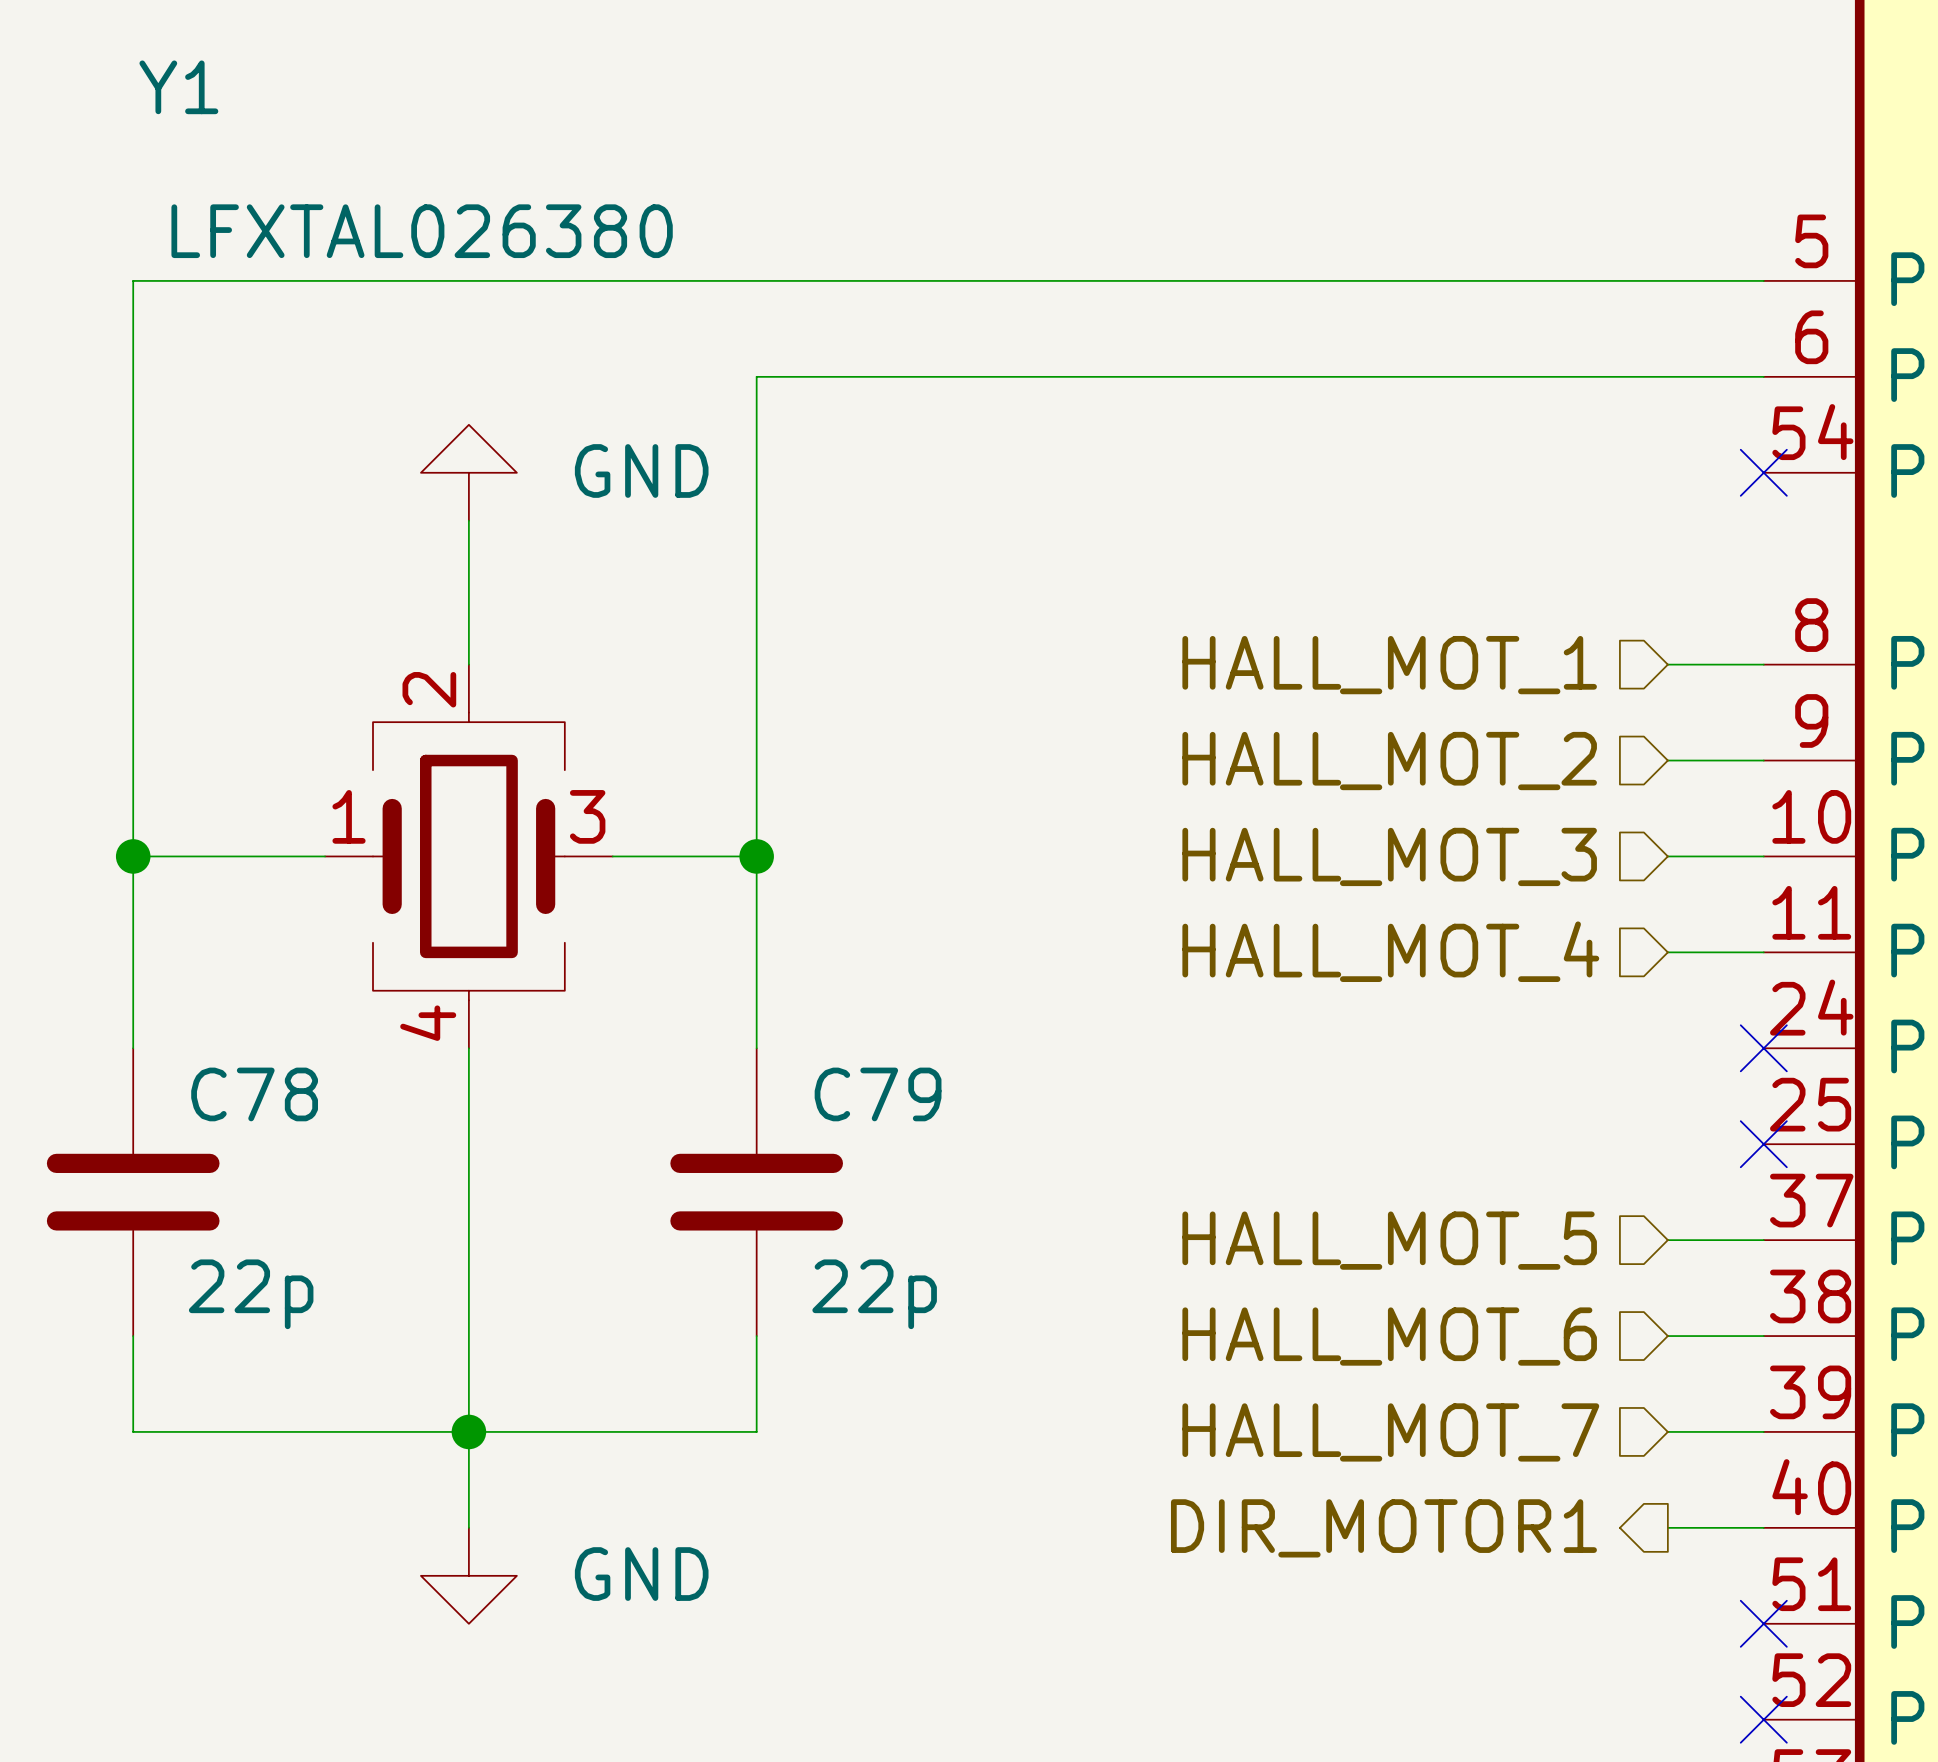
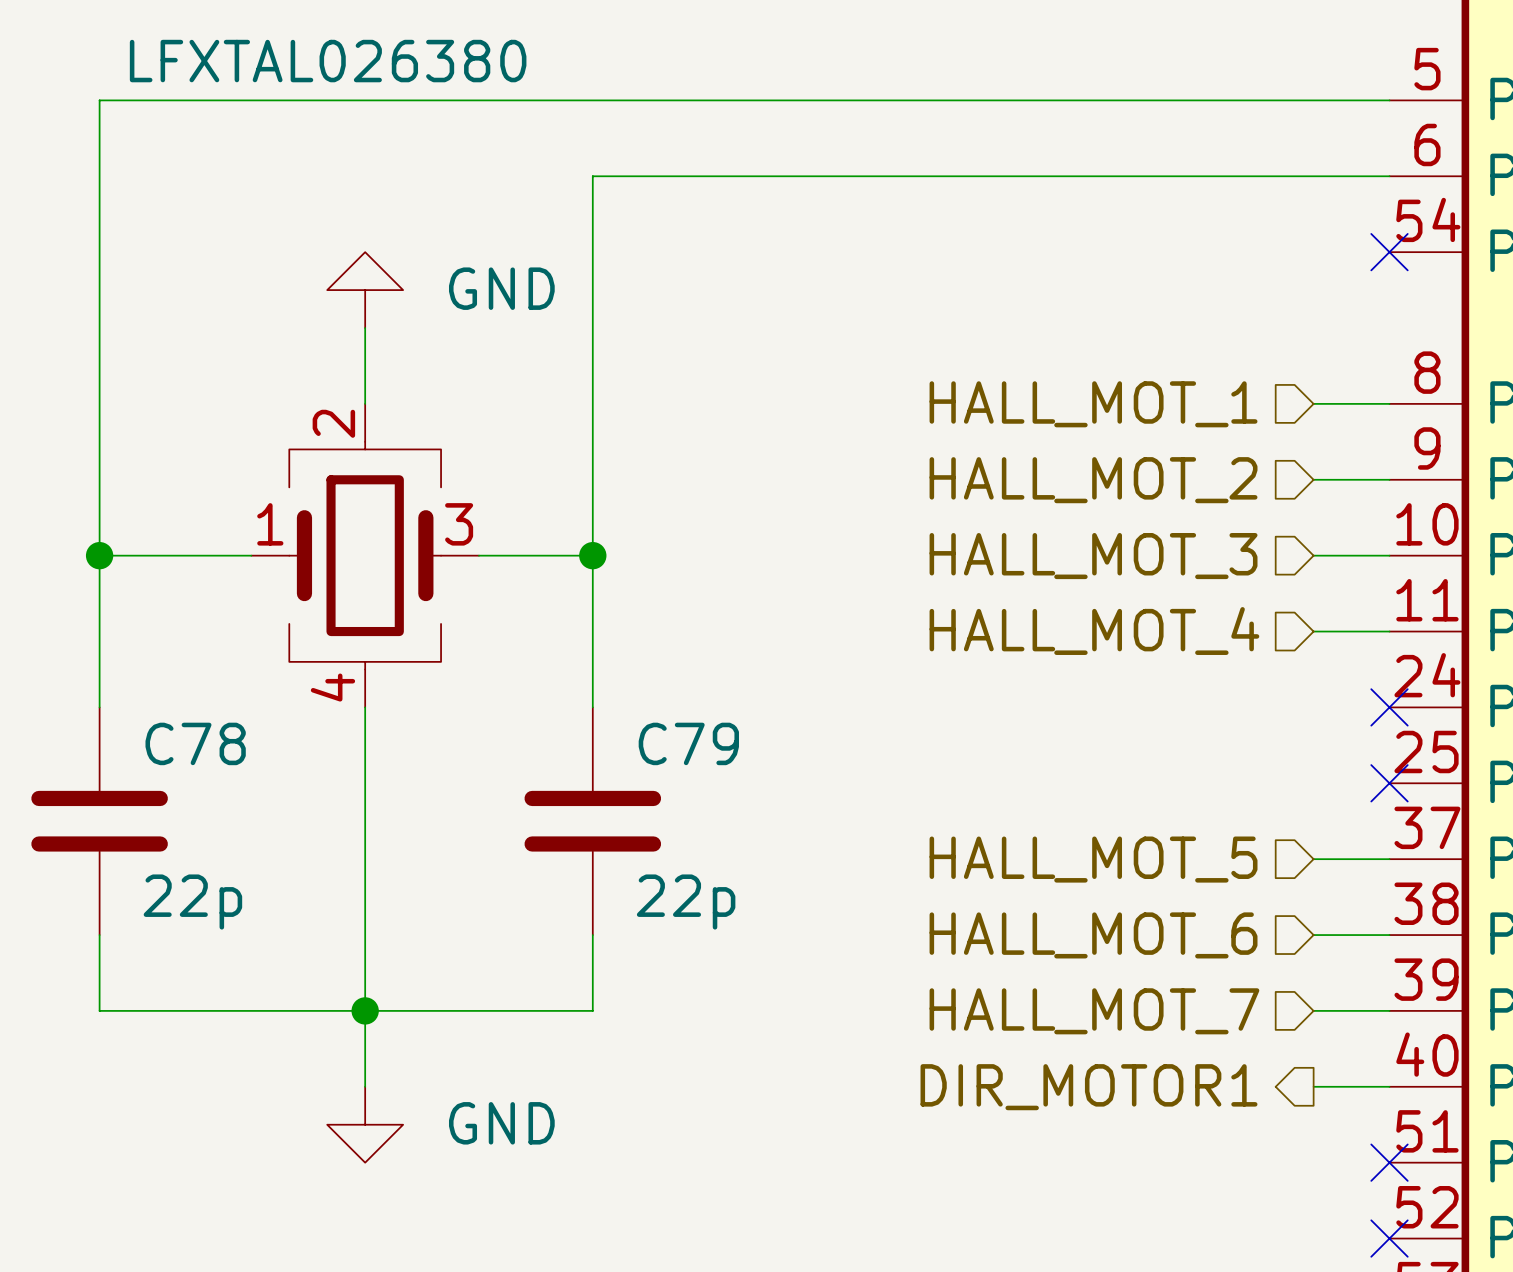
power symbol position: GND (468, 472) -> GND (365, 290)

